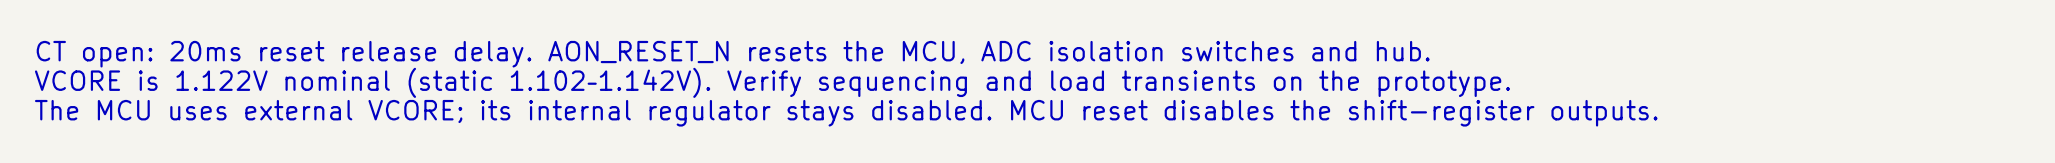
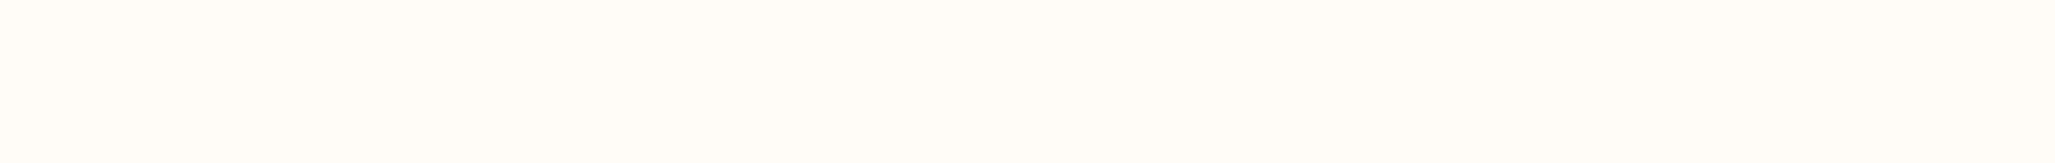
text: CT open: 20ms reset release delay. AON_RESET_N resets the MCU, ADC isolation switches and hub. (733, 54) -> none
text: VCORE is 1.122V nominal (static 1.102–1.142V). Verify sequencing and load transients on the prototype. (772, 82) -> none
text: The MCU uses external VCORE; its internal regulator stays disabled. MCU reset disables the shift-register outputs. (846, 113) -> none

